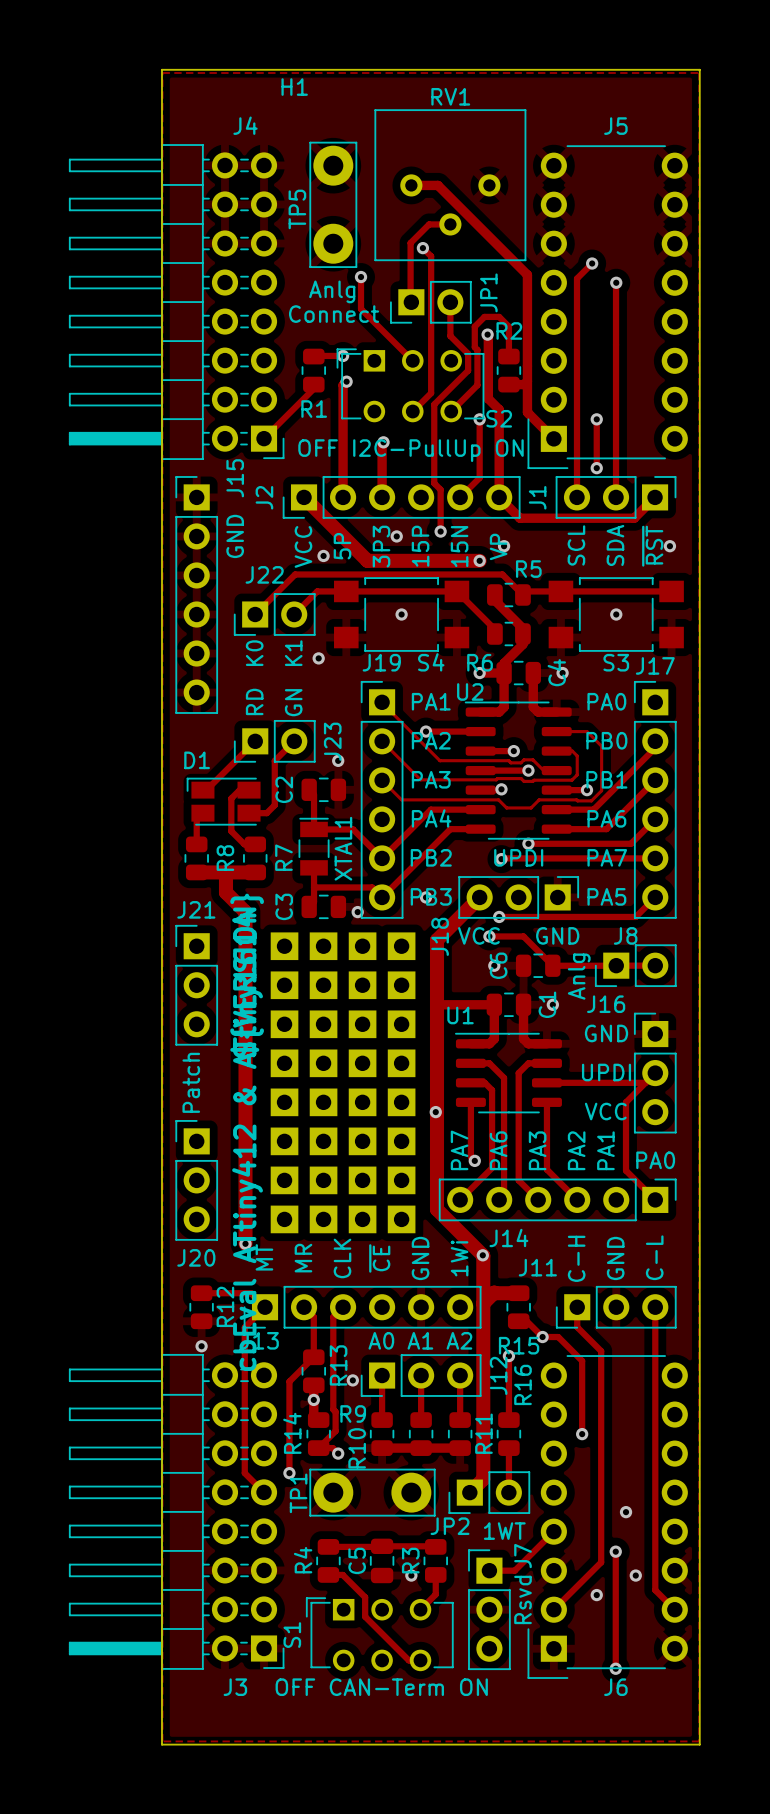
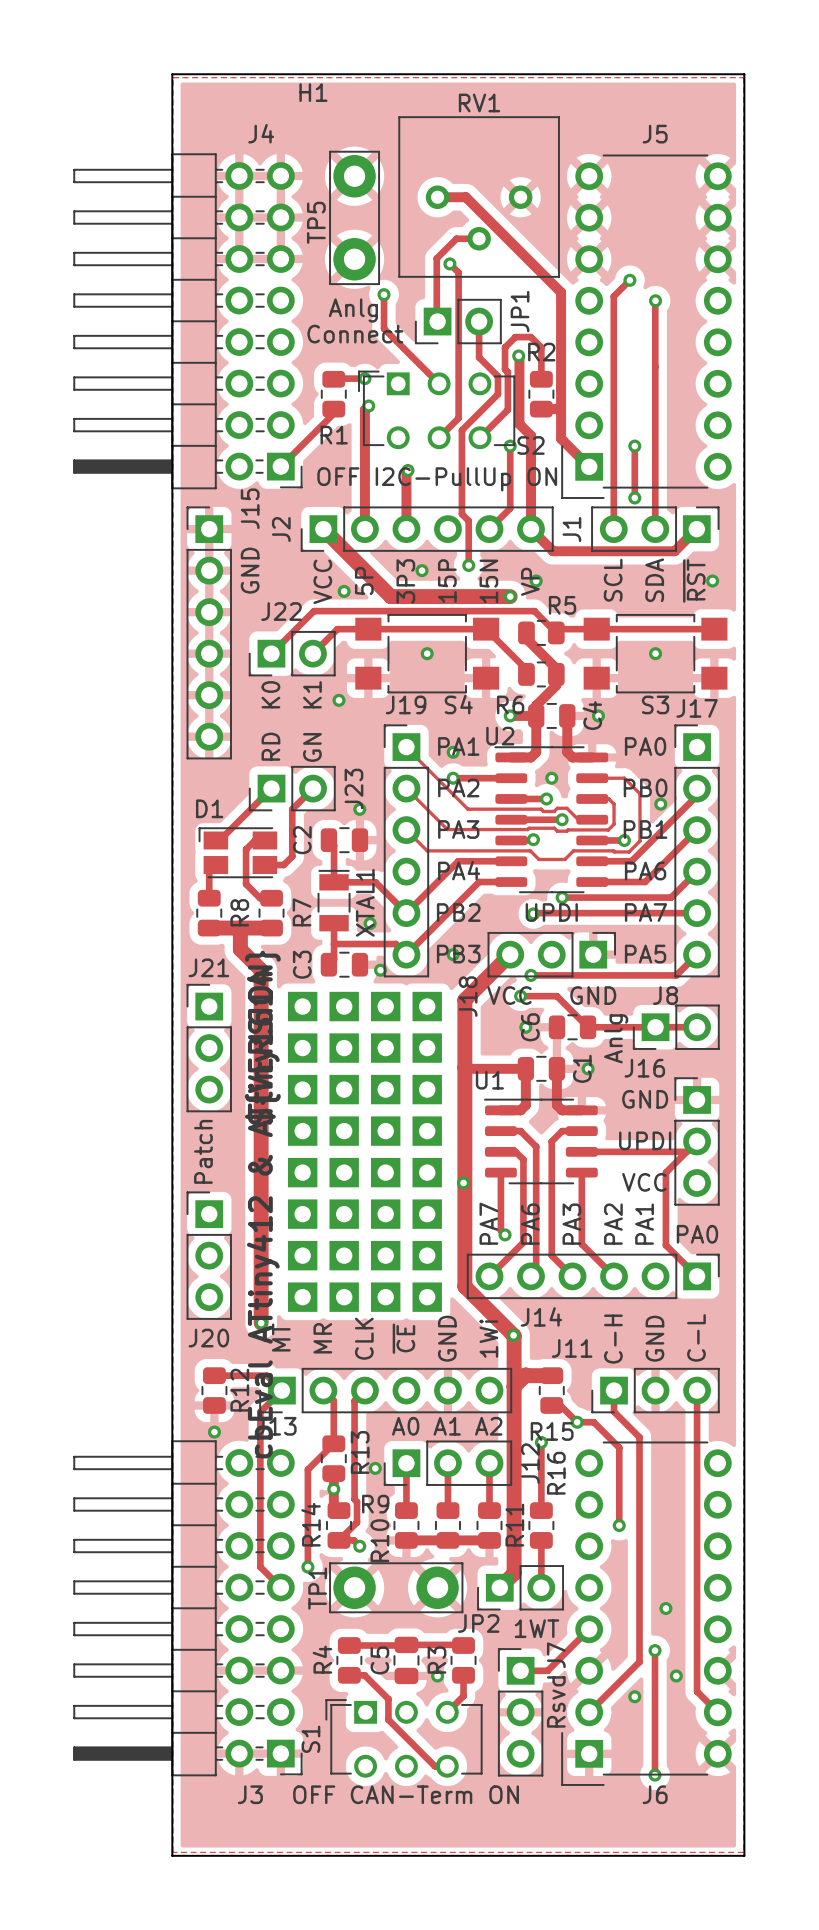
via: none -> (453, 752)
via: none -> (551, 778)
via: none -> (660, 804)
via: none -> (370, 923)

